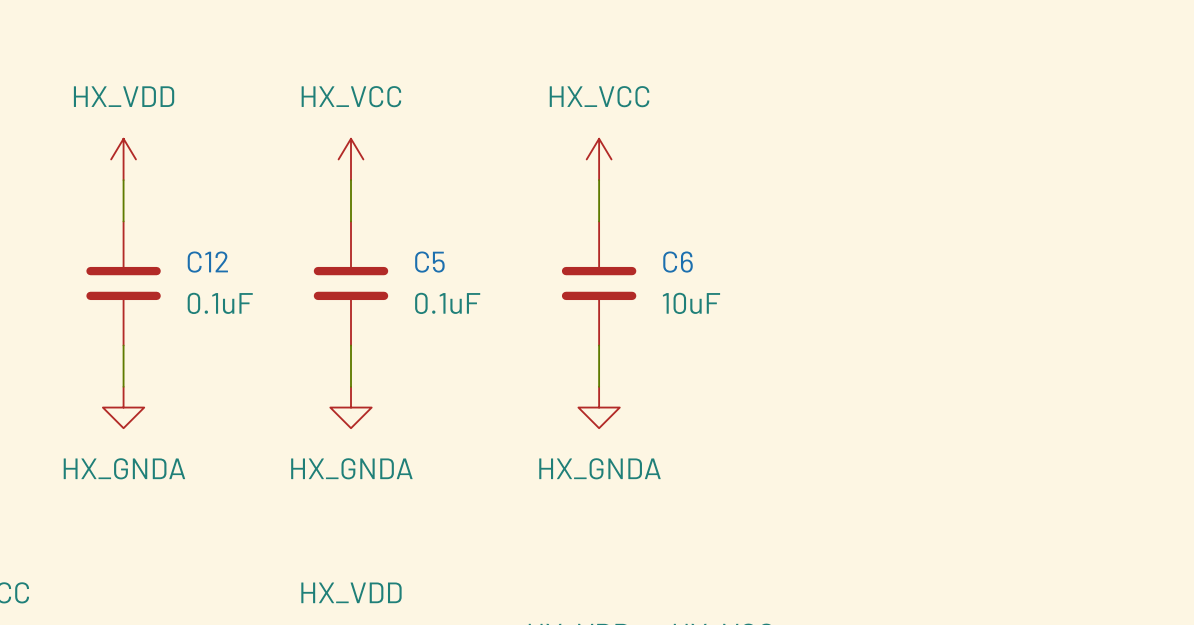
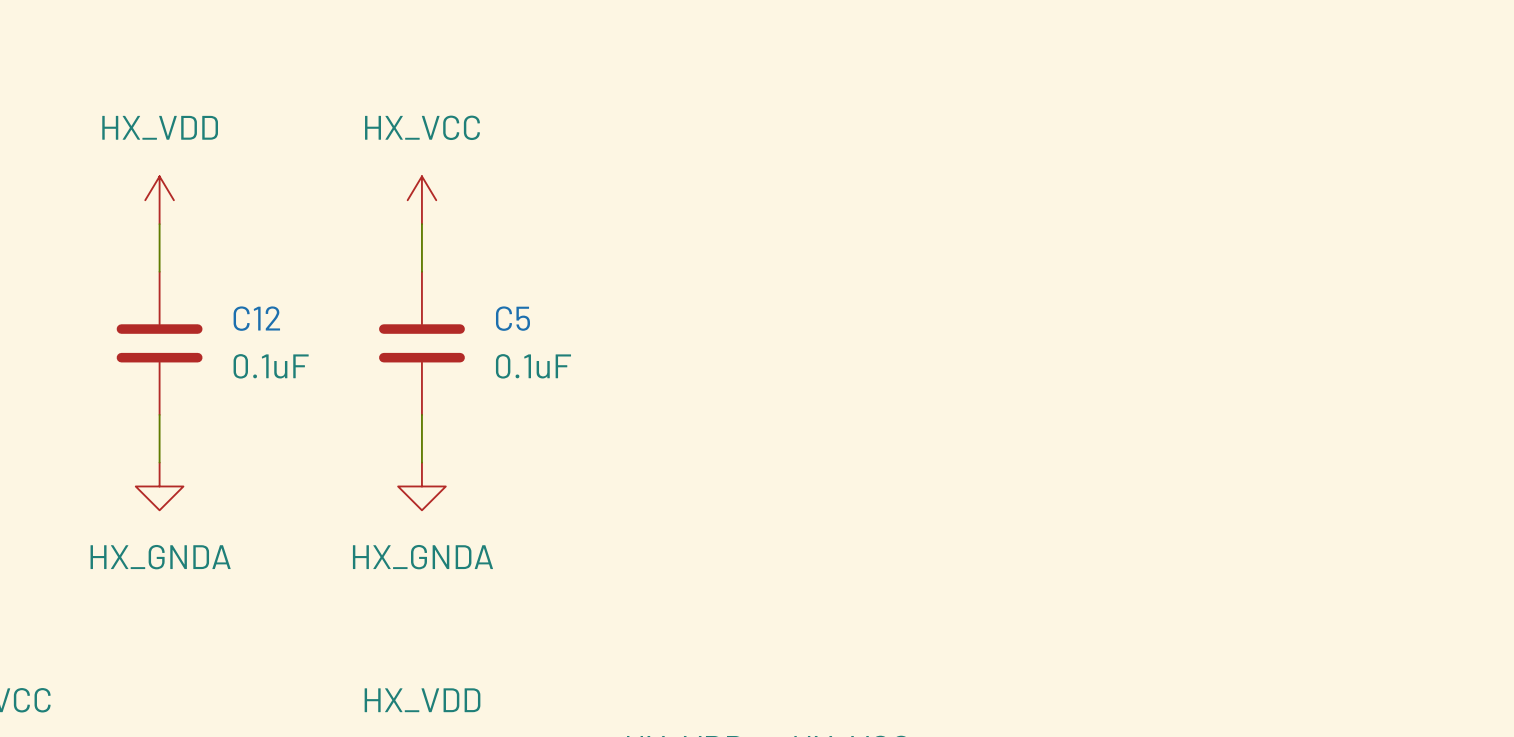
power symbol: HX_VCC (599, 159) -> none
wire: (599, 180) (599, 221) -> none
C6: 10uF (599, 283) -> none
wire: (599, 345) (599, 386) -> none
power symbol: HX_GNDA (599, 407) -> none

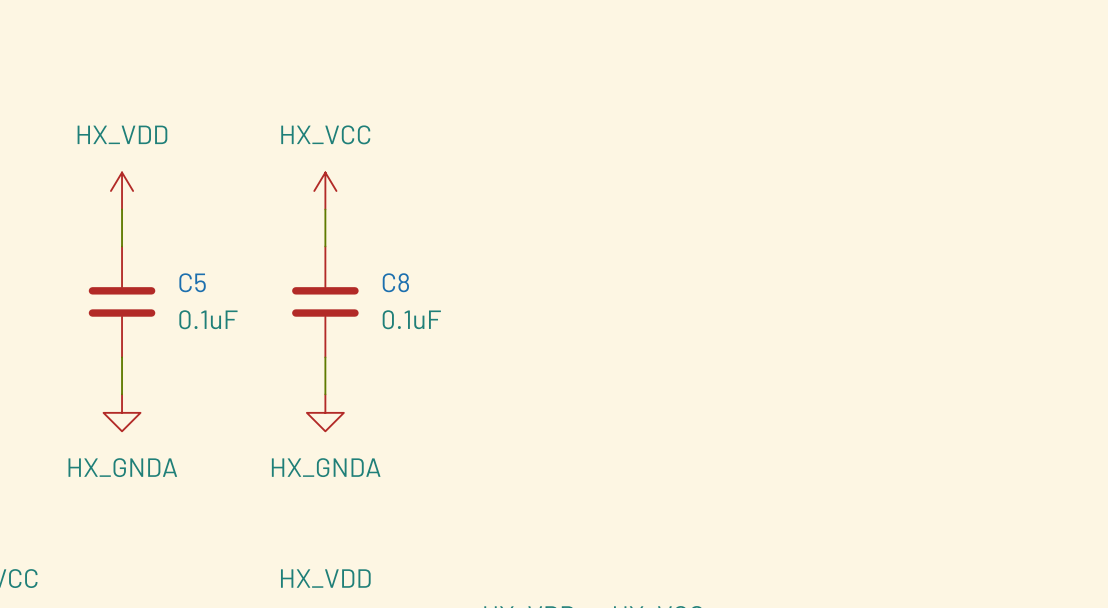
C12 name: C12 (256, 318) -> C5 (192, 282)
C5 name: C5 (512, 318) -> C8 (395, 282)

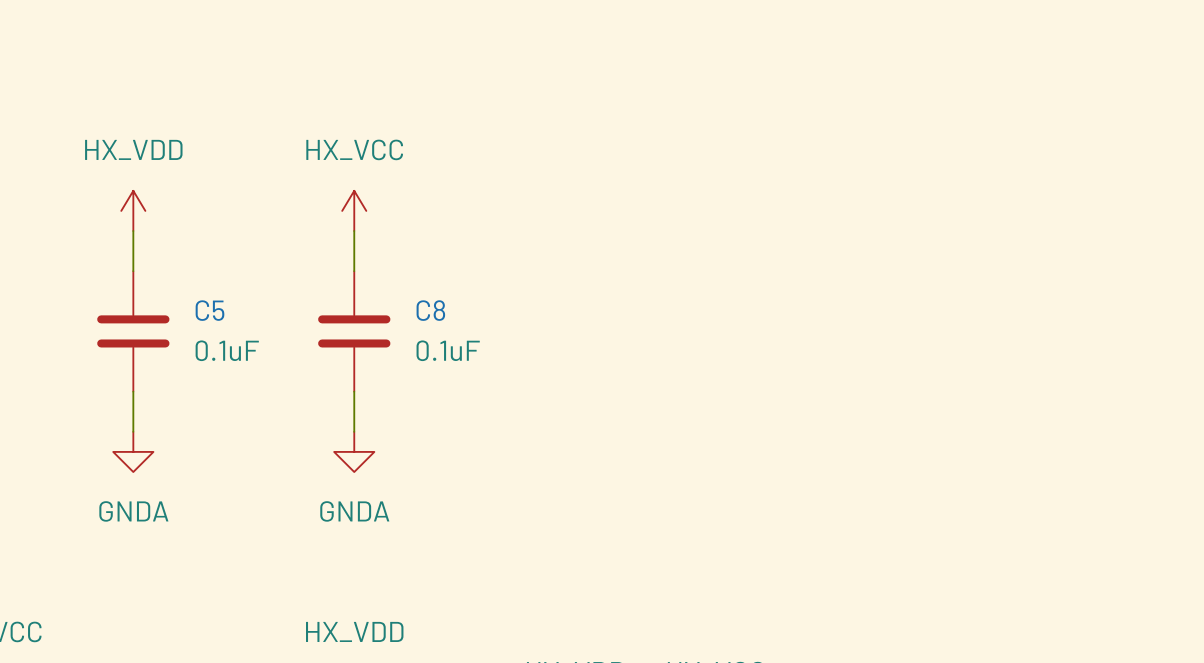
power symbol: HX_GNDA (122, 412) -> GNDA (133, 451)
power symbol: HX_GNDA (325, 412) -> GNDA (354, 451)

